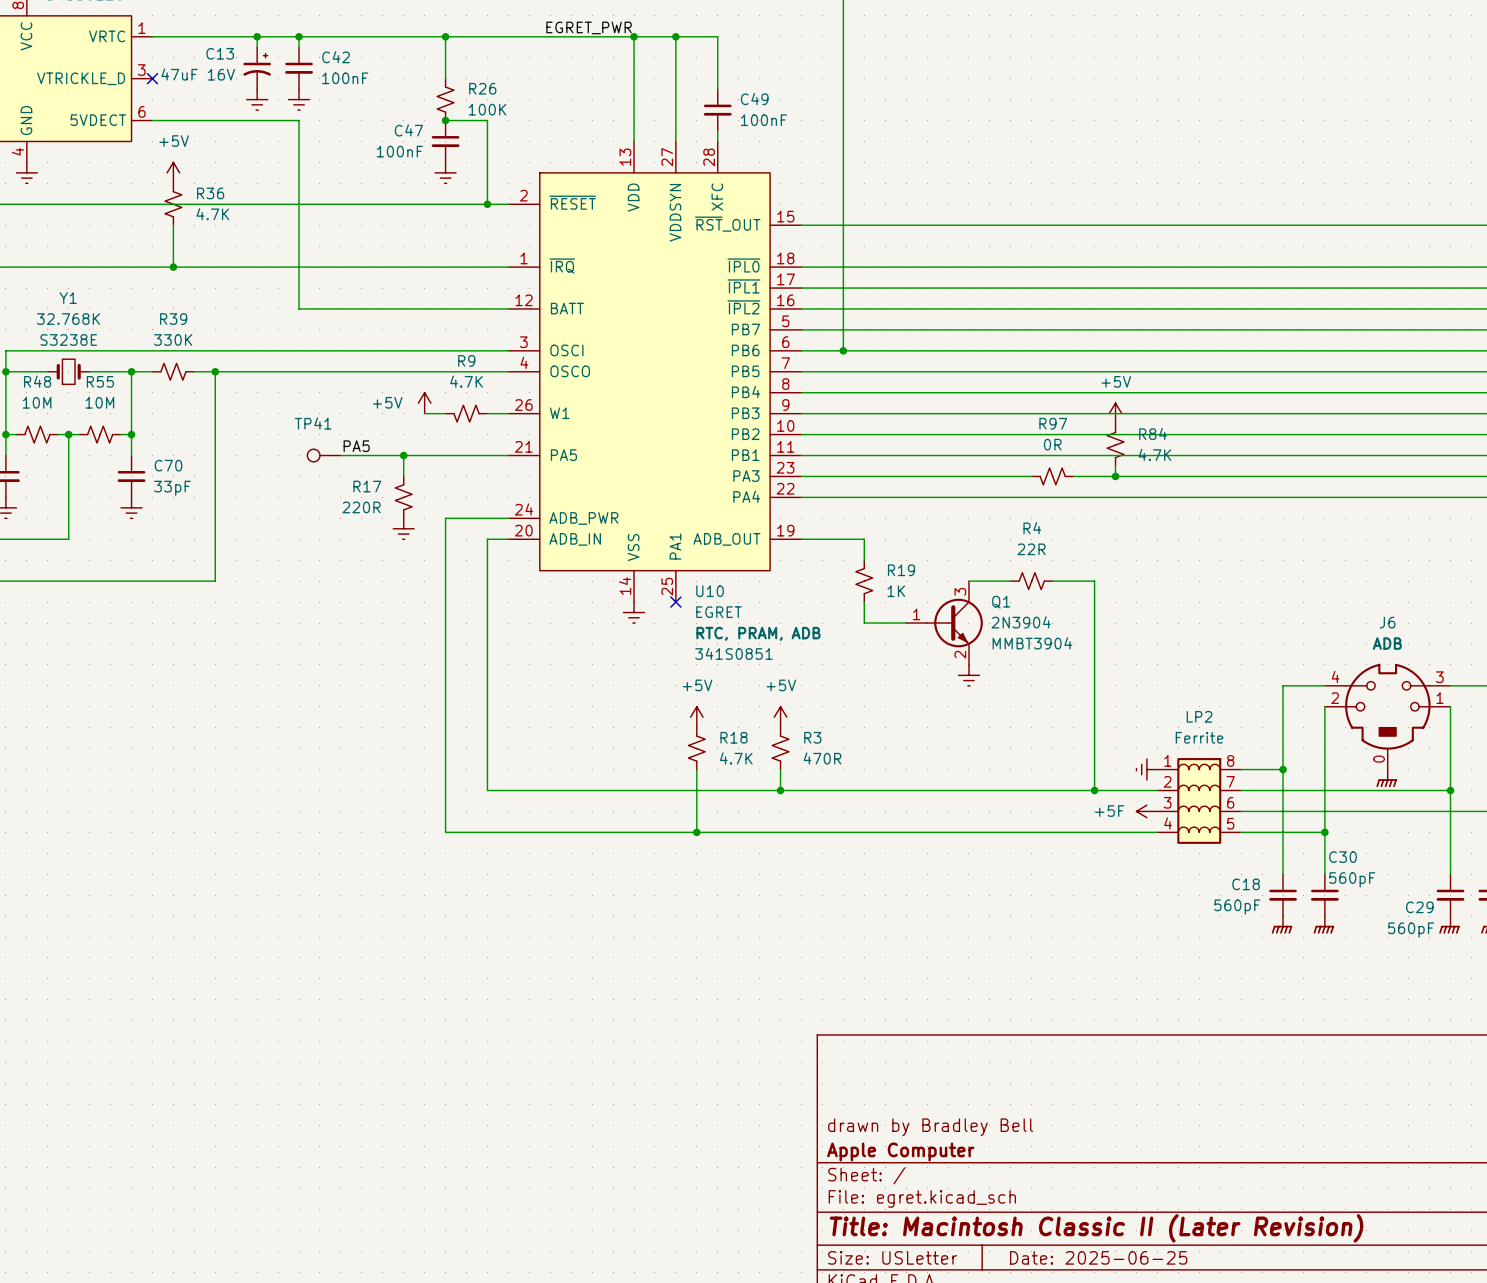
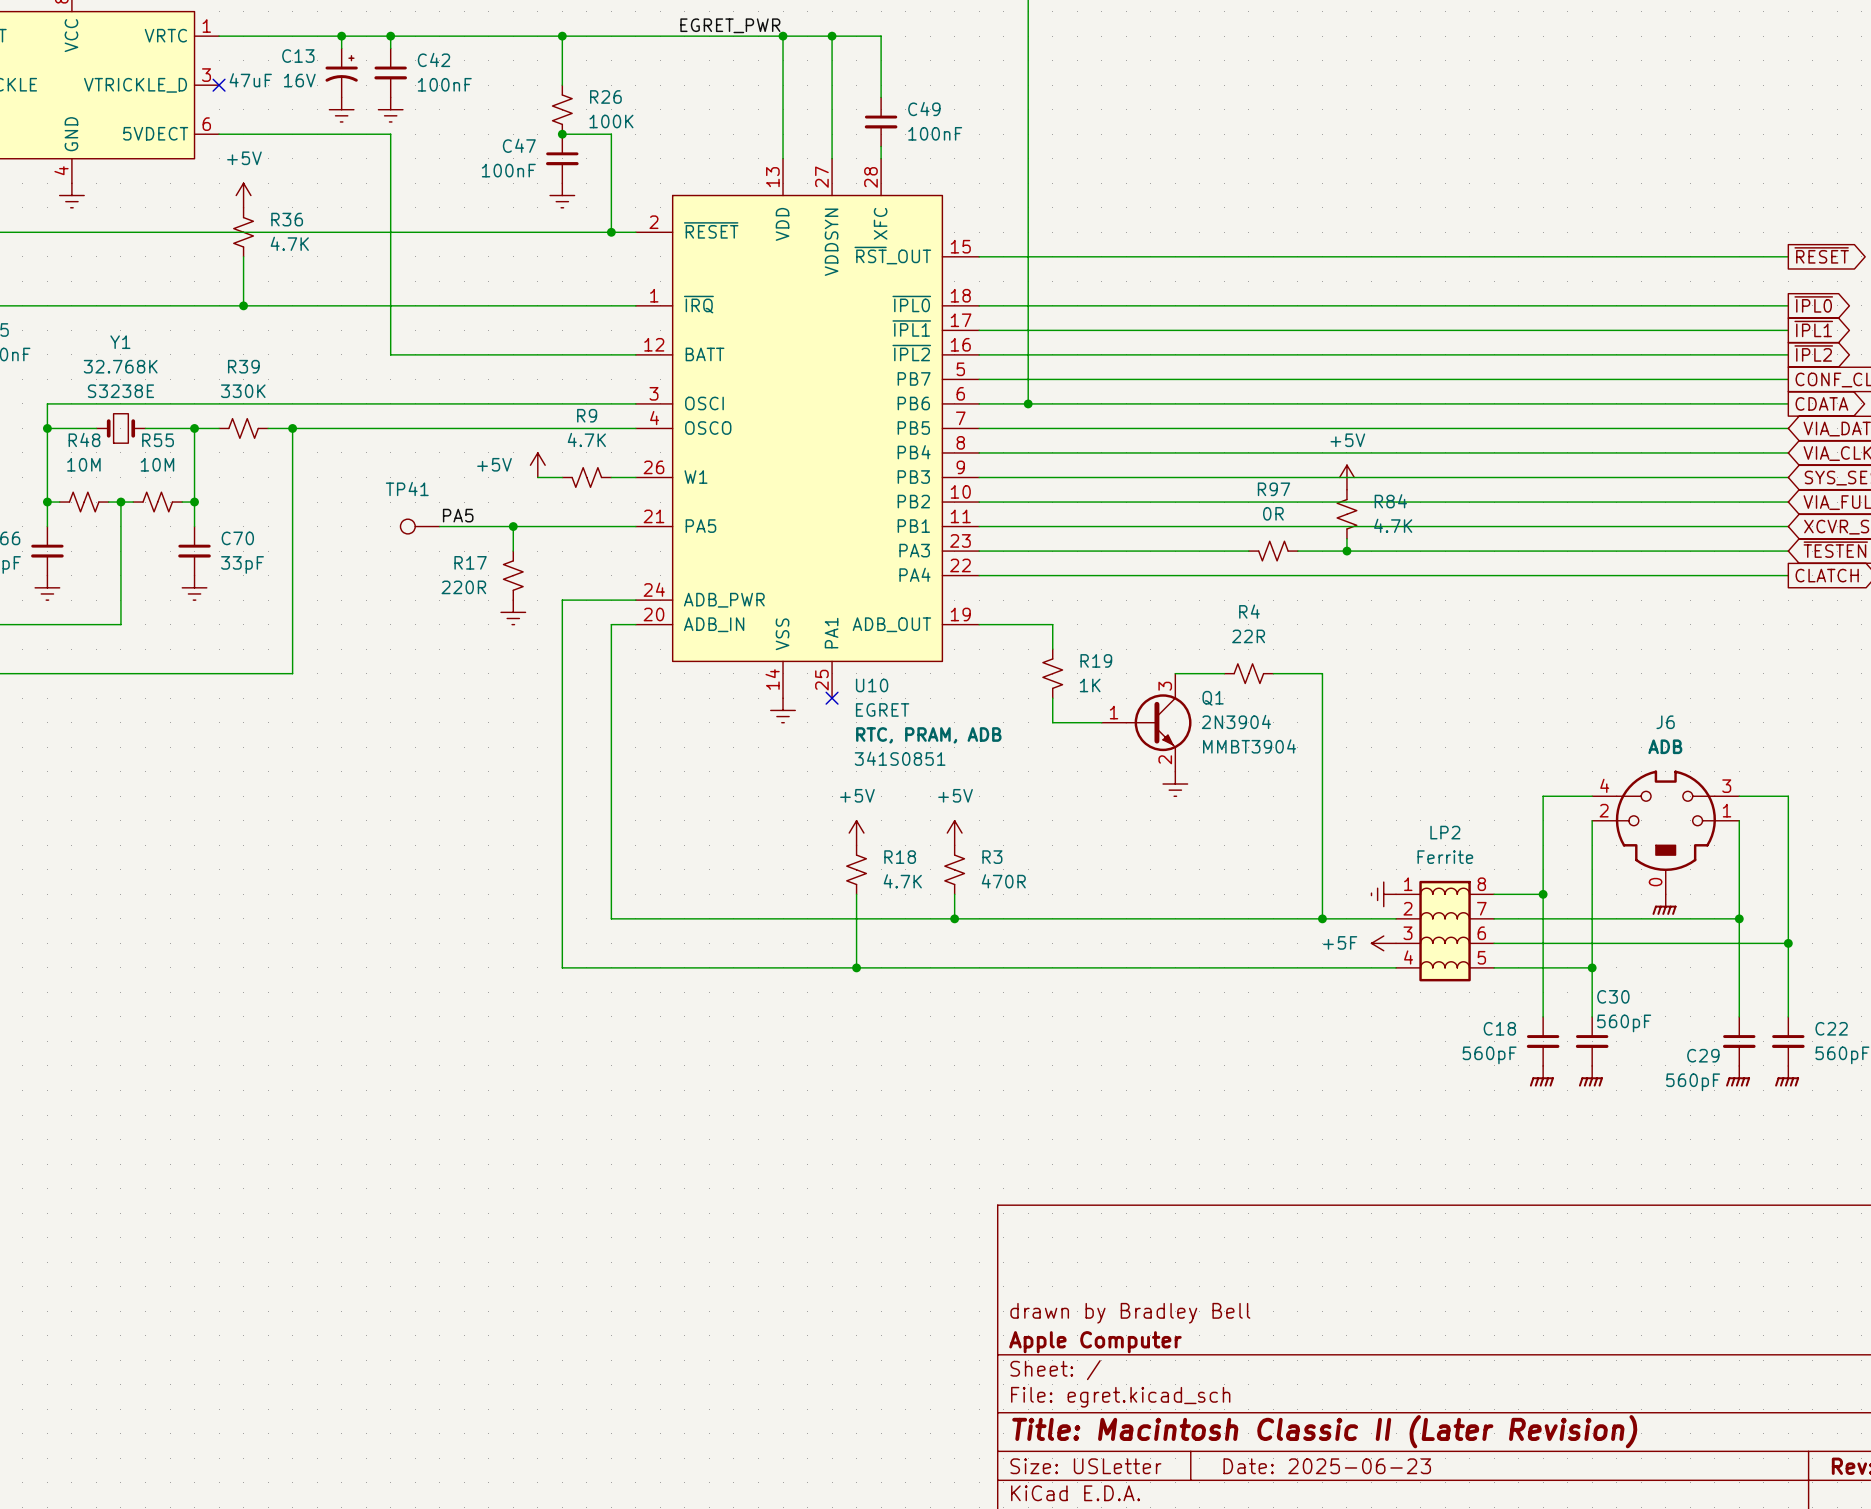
title block: Date: 2025-06-25 (1098, 1257) -> Date: 2025-06-23 (1327, 1466)

